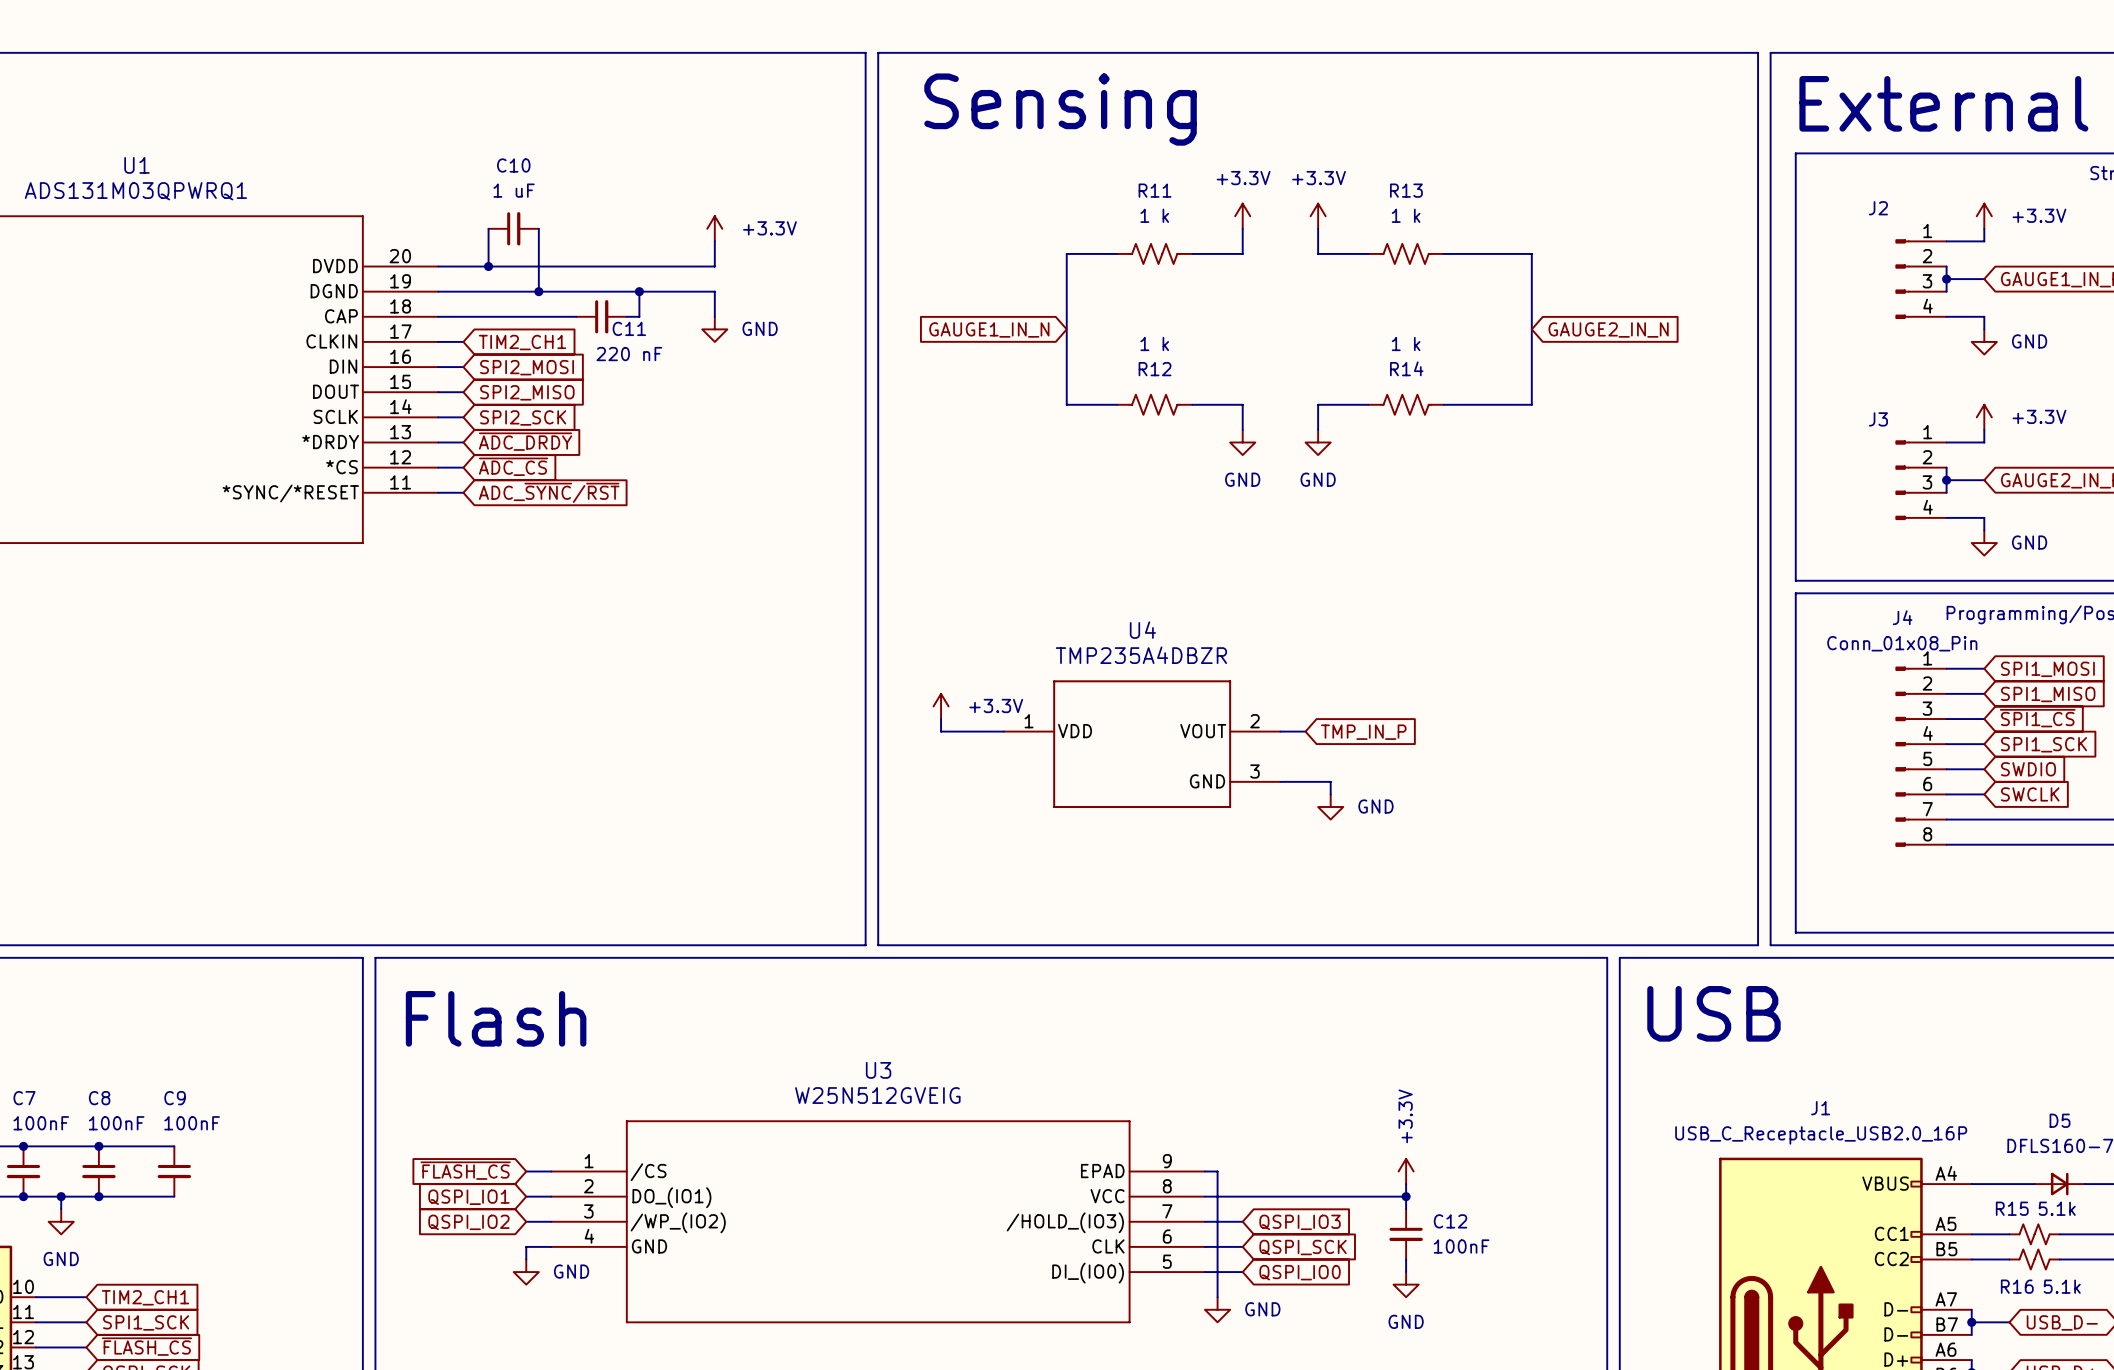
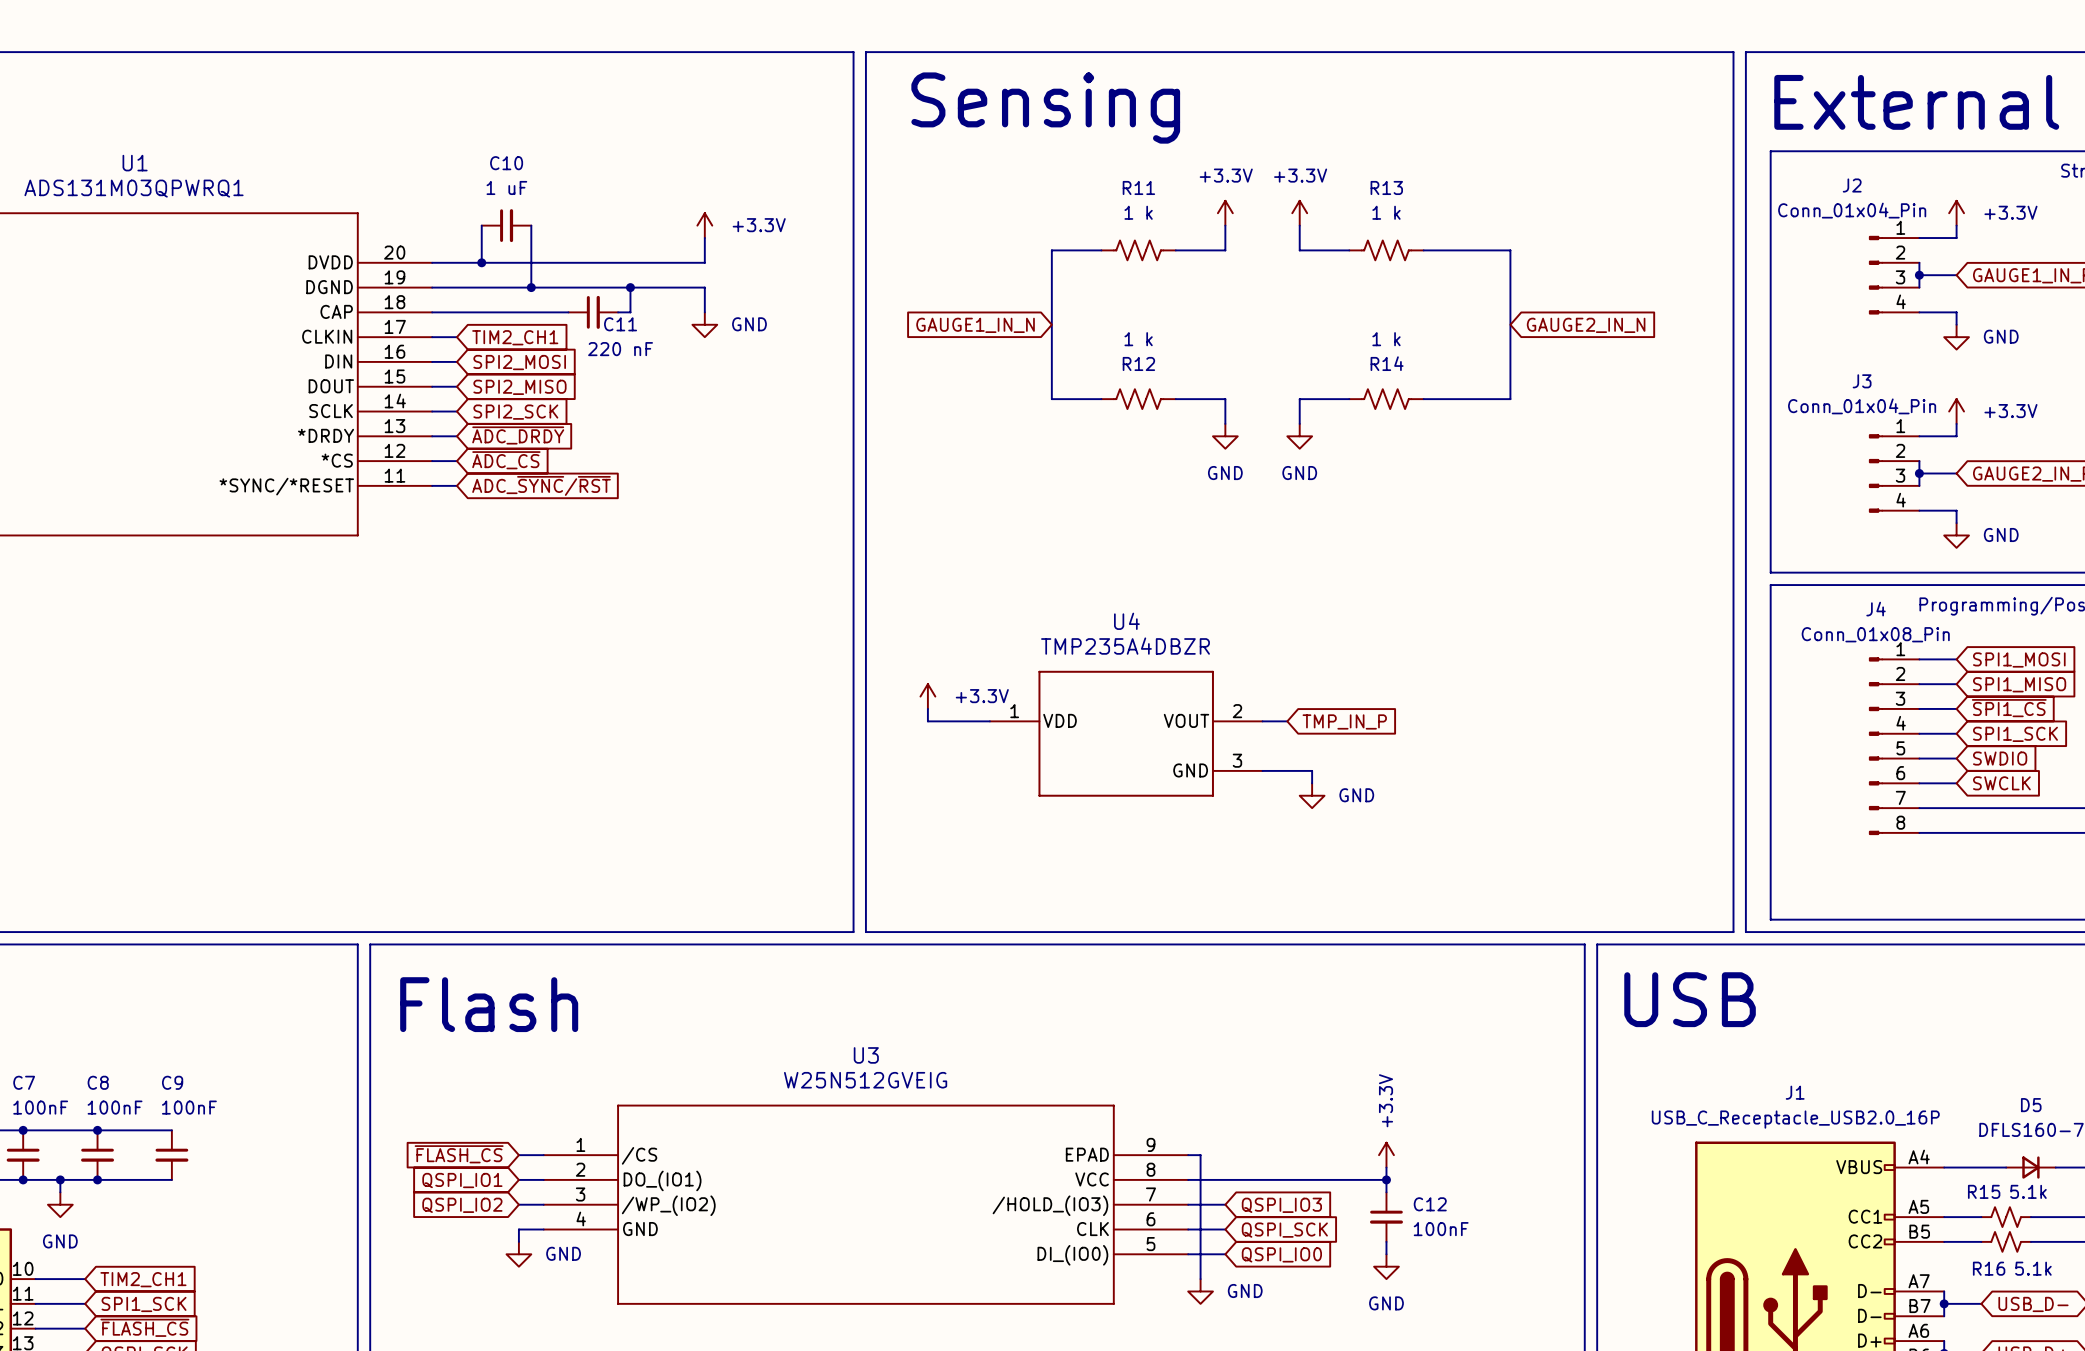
J2 name position: J2 (1878, 208) -> J2 (1852, 185)
J2 value: none -> Conn_01x04_Pin (1852, 210)
J3 value: none -> Conn_01x04_Pin (1862, 406)
J3 name position: J3 (1878, 419) -> J3 (1862, 381)

